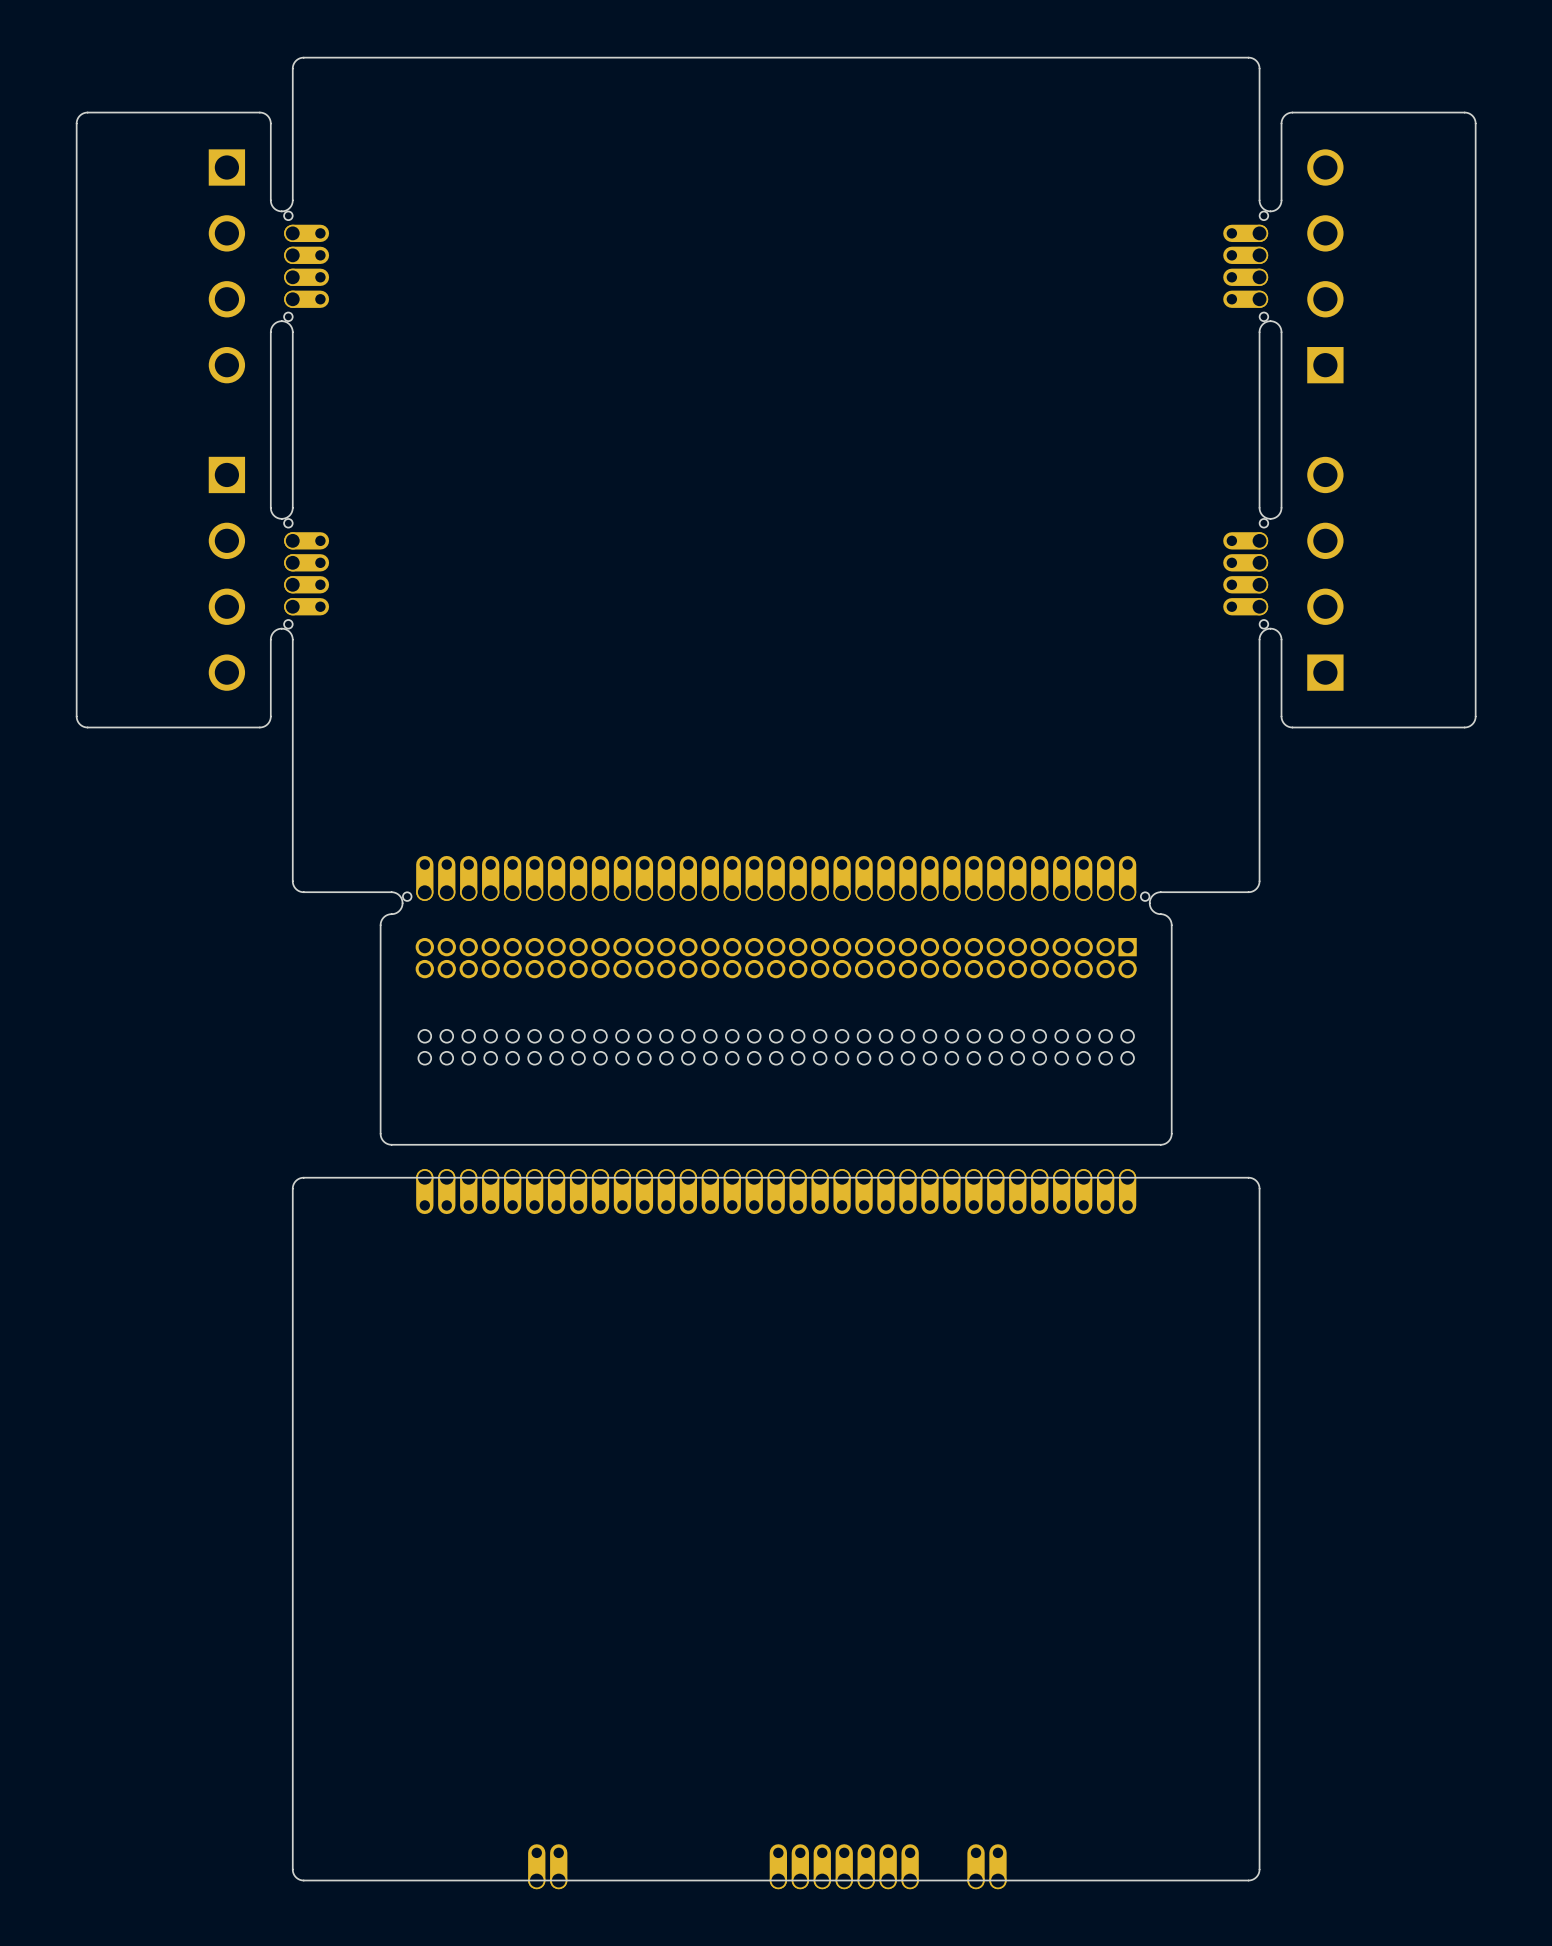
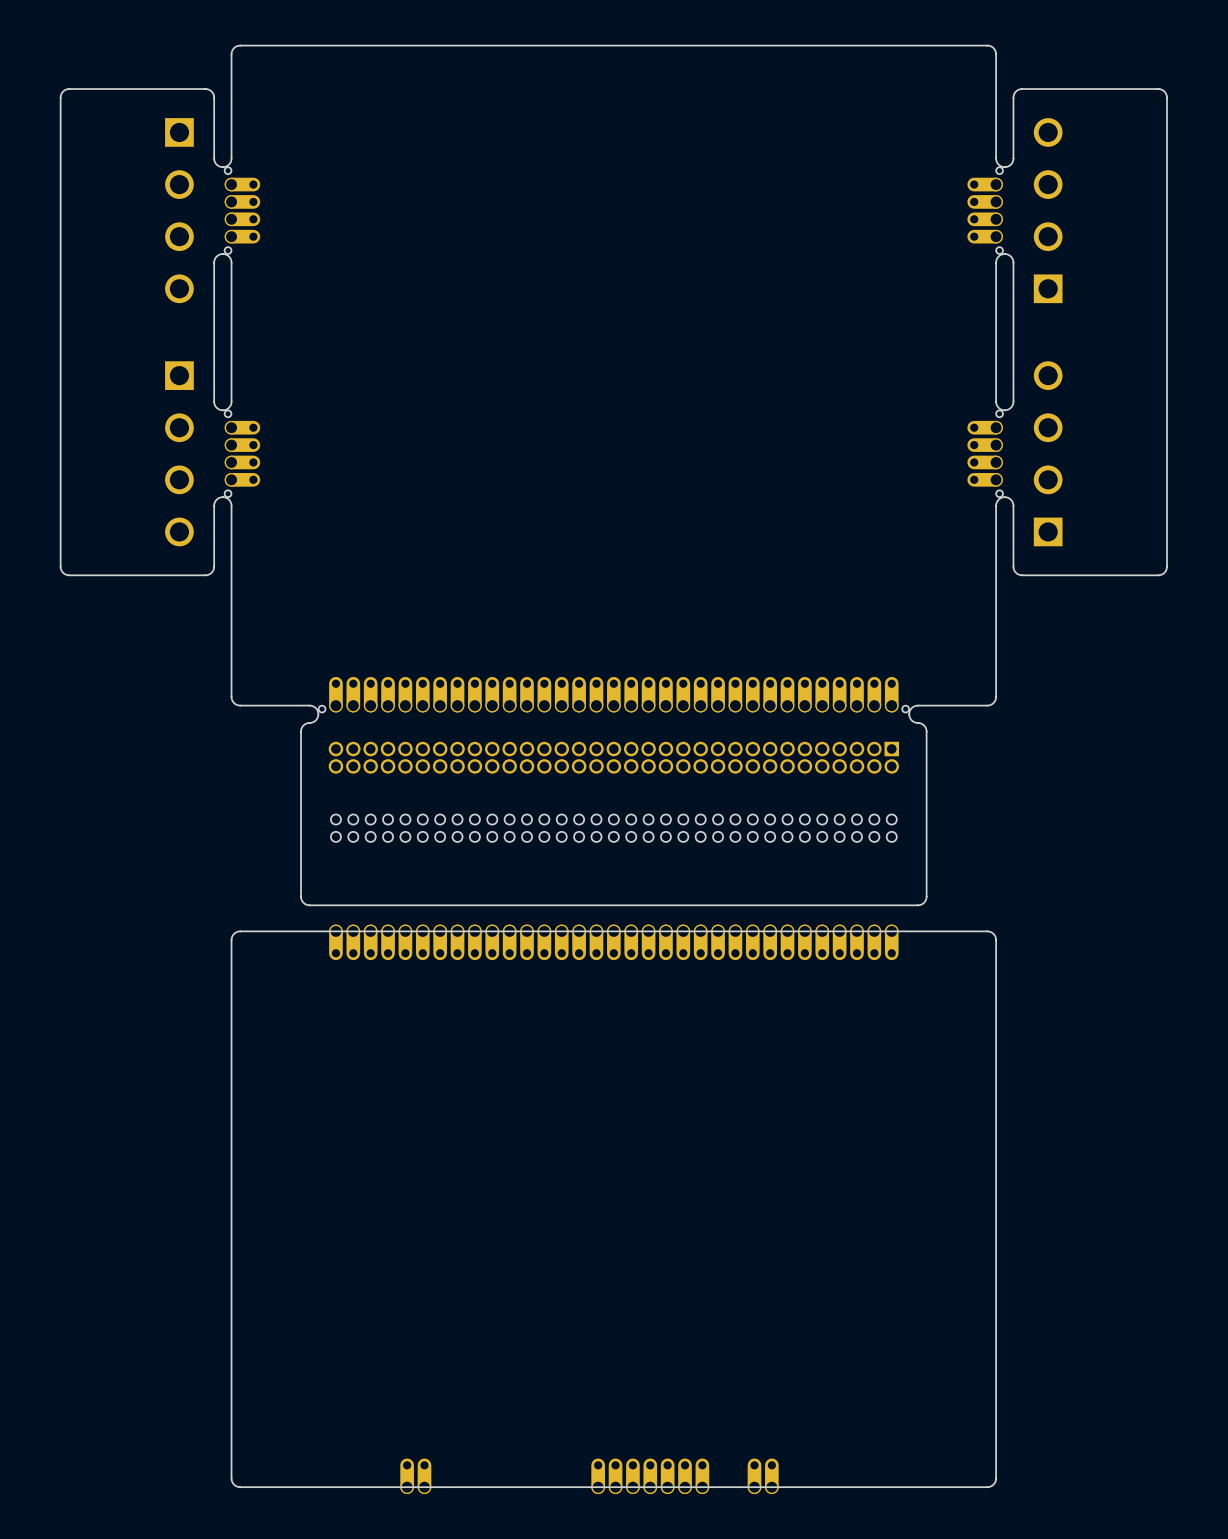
part position: (558, 1866) -> (407, 1476)
part: none -> (598, 1476)
part: (910, 1866) -> none
part: none -> (754, 1476)
part: (997, 1866) -> none

